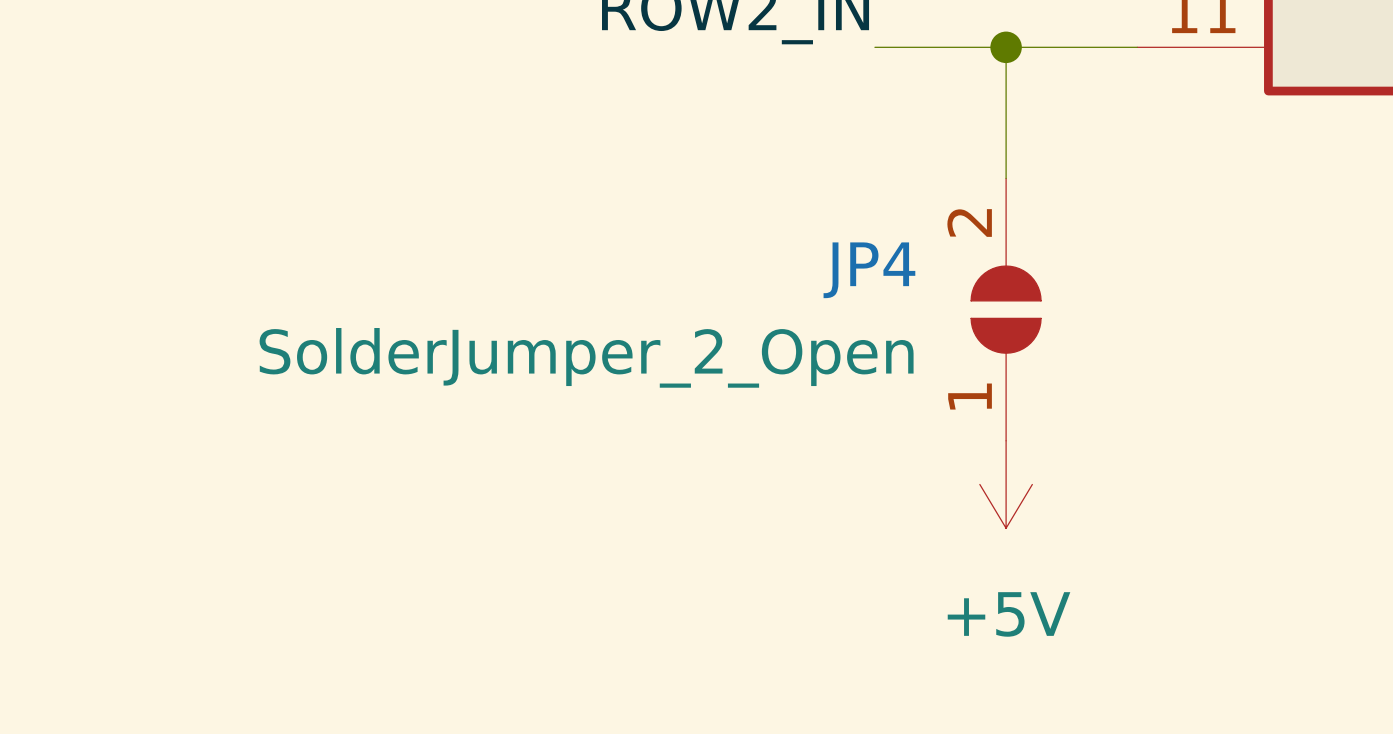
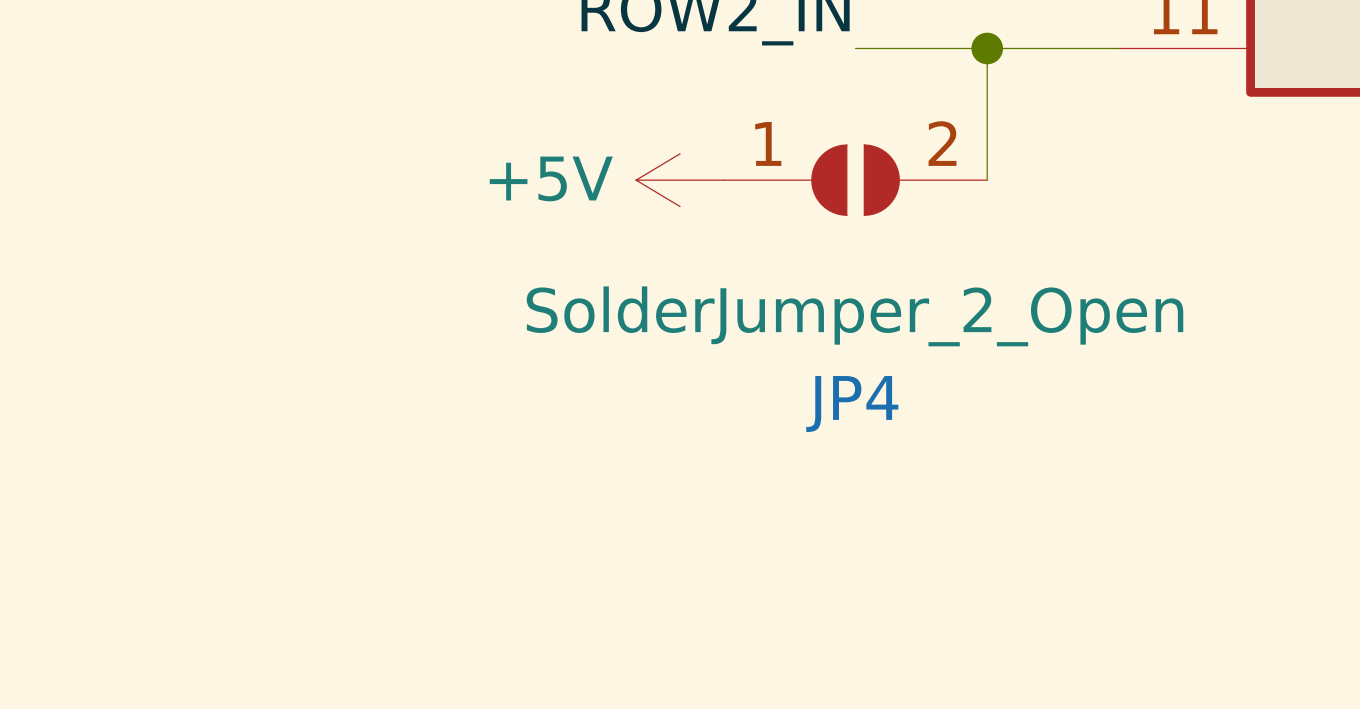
JP4 name position: JP4 (869, 270) -> JP4 (852, 403)
JP4 rotation: 0° (1006, 309) -> 90° clockwise (855, 180)
JP4 position: (1006, 309) -> (855, 180)
JP4 value position: SolderJumper_2_Open (586, 357) -> SolderJumper_2_Open (854, 316)
power symbol rotation: 0° (1006, 484) -> 90° clockwise (680, 180)
power symbol position: +5V (1006, 484) -> +5V (680, 180)

